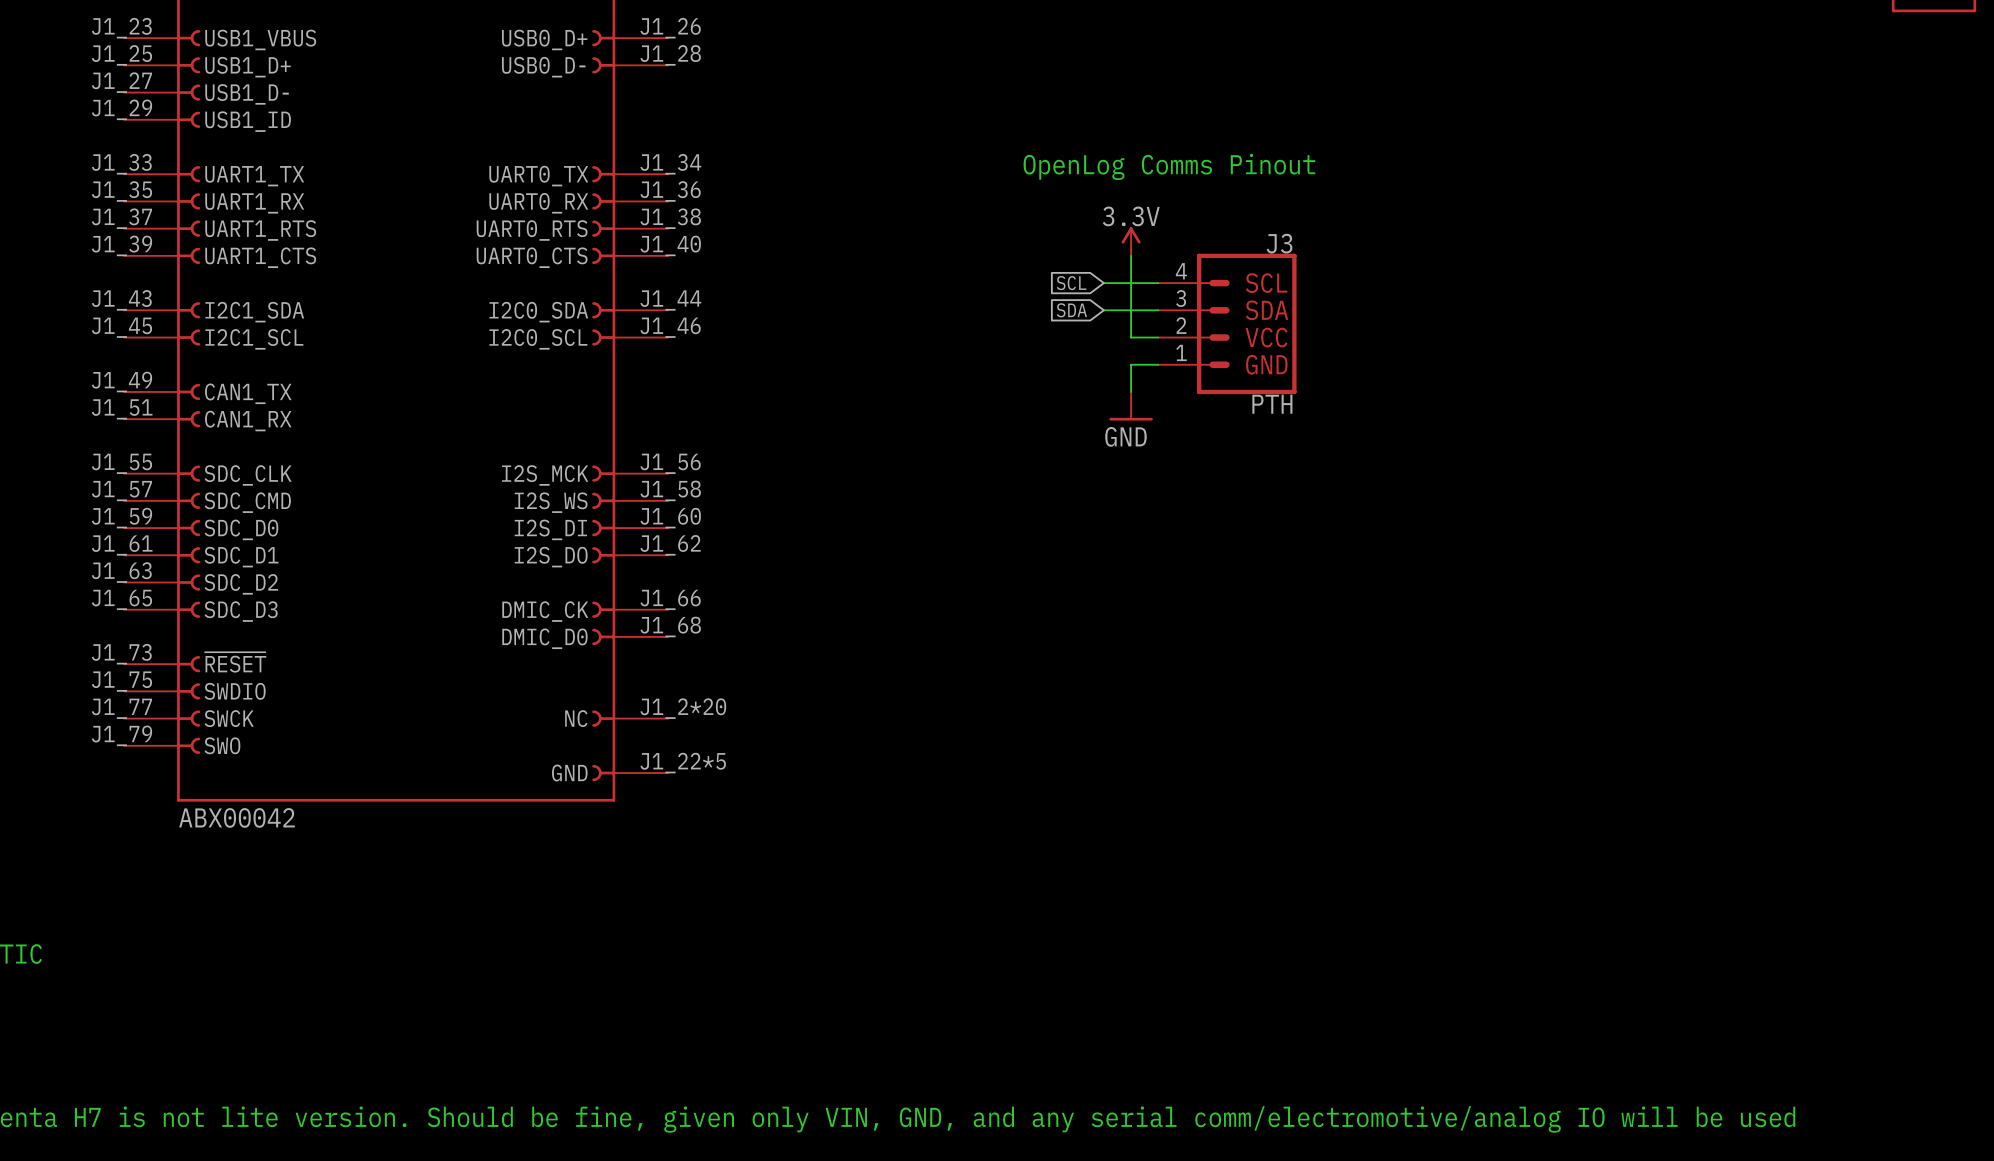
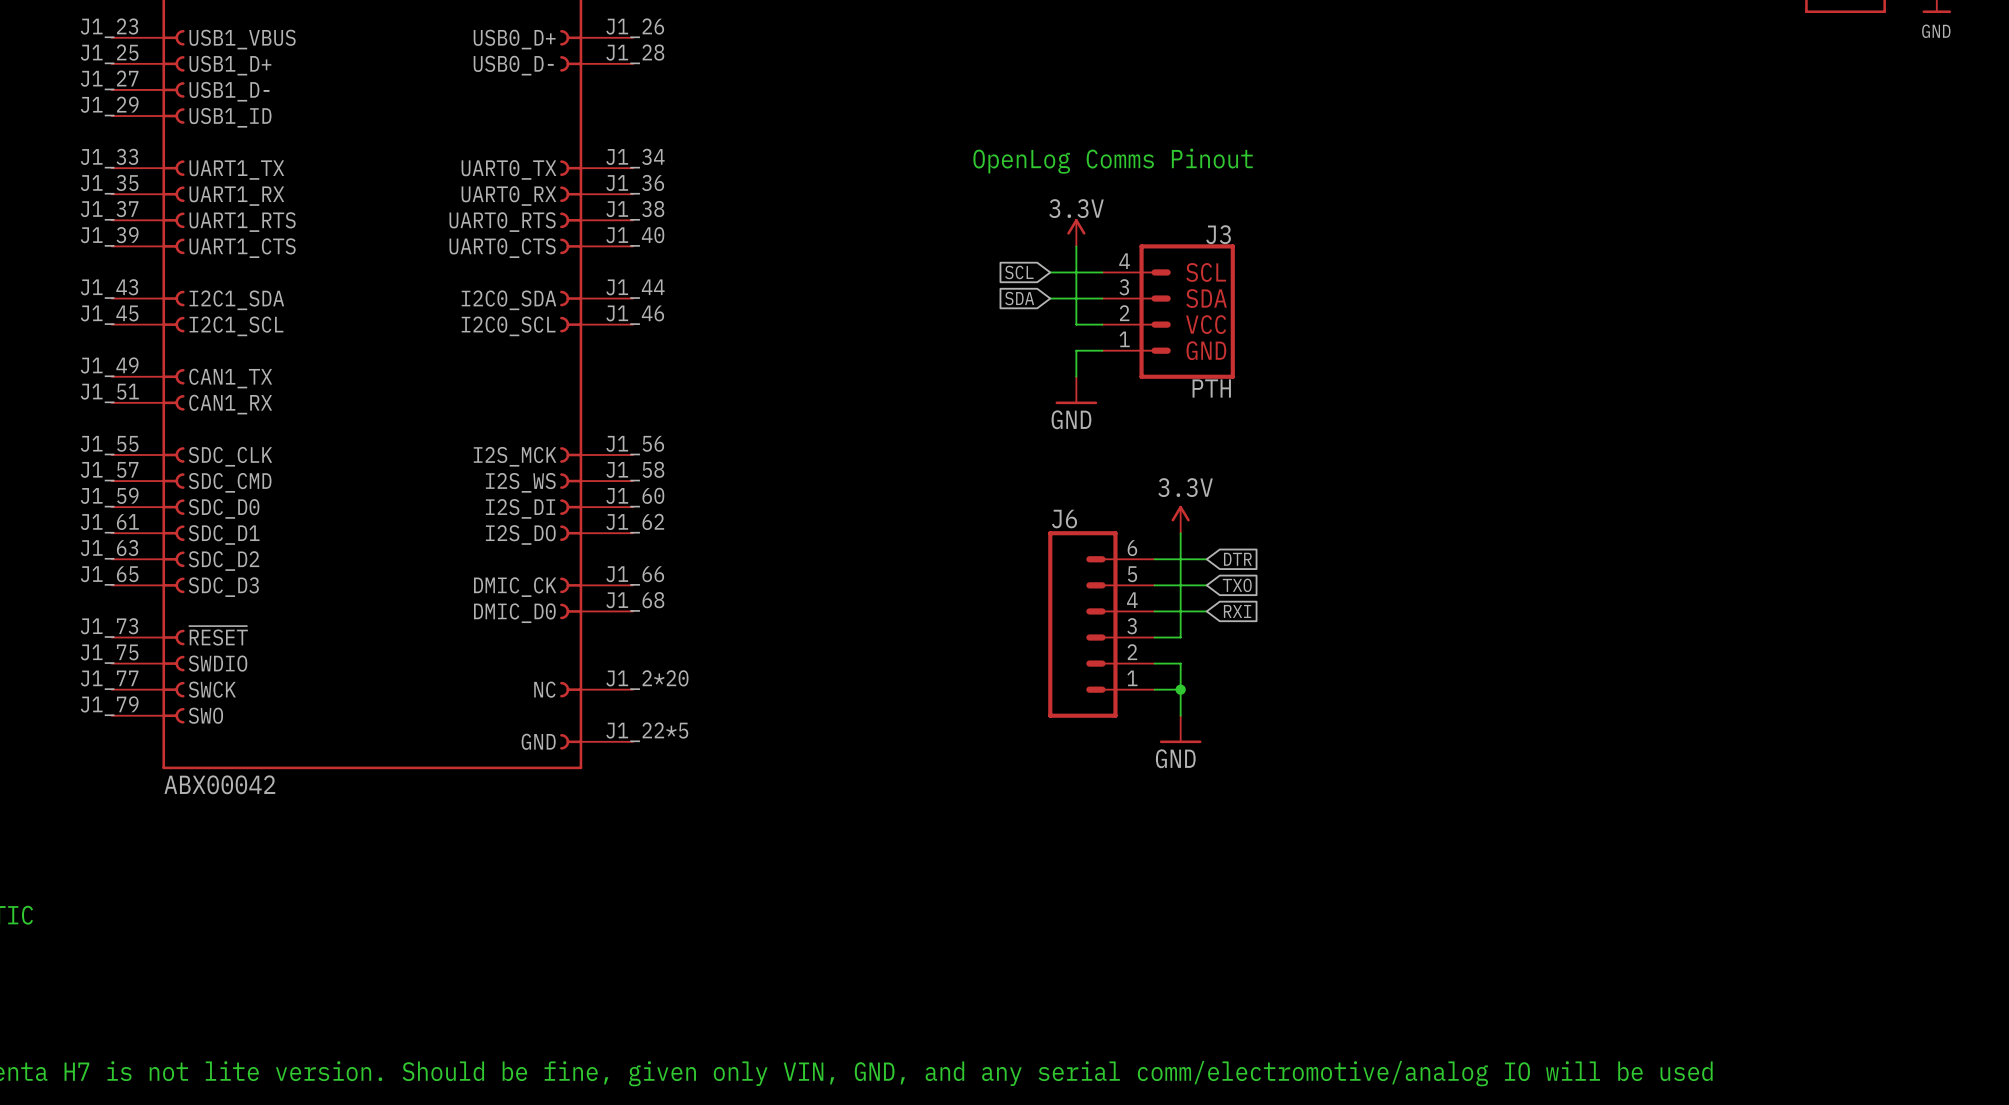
power symbol: none -> 3.3V (1180, 519)
wire: none -> (1180, 533) (1180, 637) (1154, 637)
wire: none -> (1154, 559) (1206, 559)
global label: none -> DTR (1237, 559)
wire: none -> (1154, 585) (1206, 585)
global label: none -> TXO (1237, 585)
wire: none -> (1154, 611) (1206, 611)
global label: none -> RXI (1237, 611)
J6: none -> (1101, 624)
wire: none -> (1154, 663) (1180, 663) (1180, 715)
wire: none -> (1154, 689) (1180, 689)
junction: none -> (1180, 689)
power symbol: none -> GND (1180, 729)

